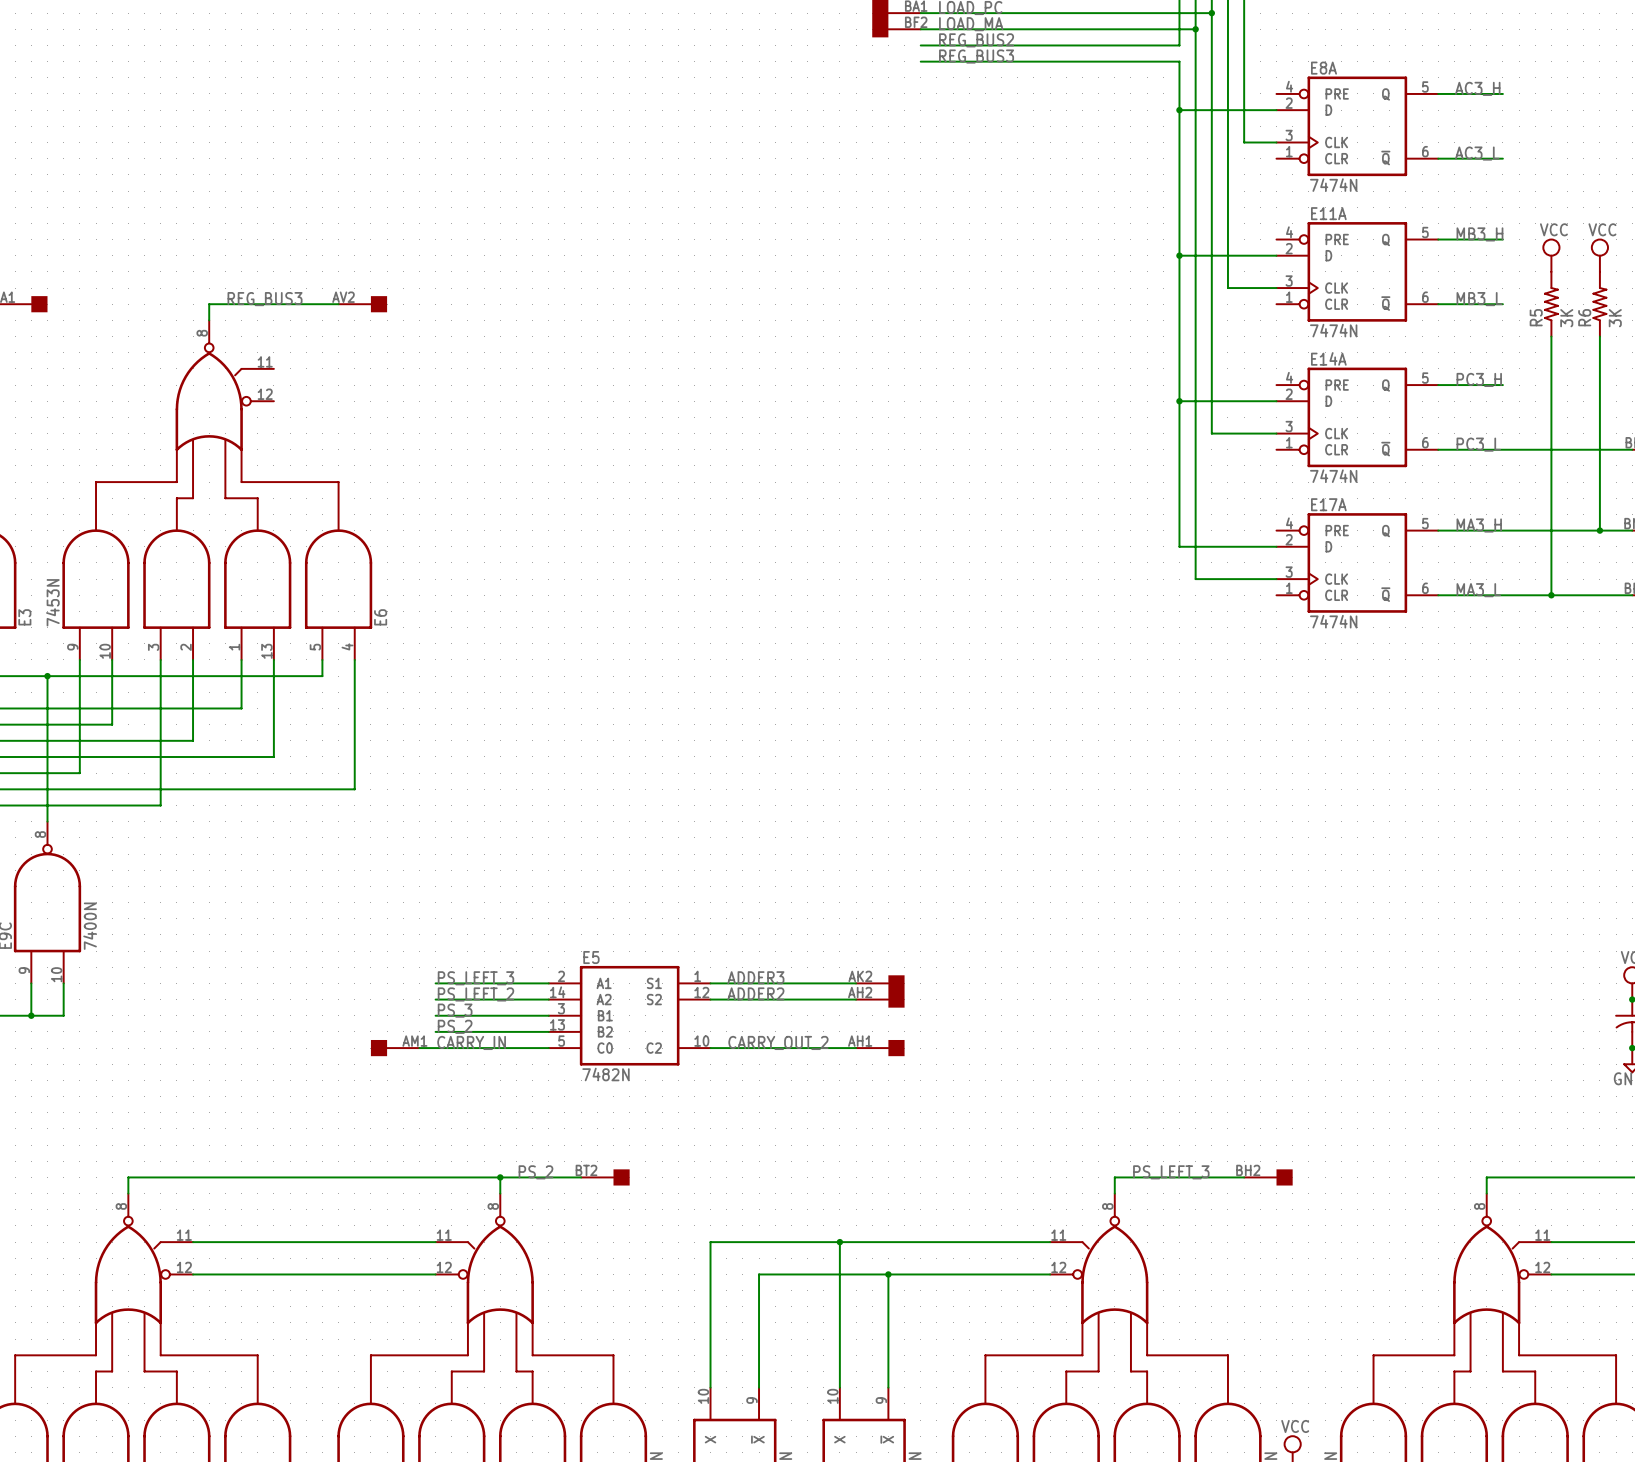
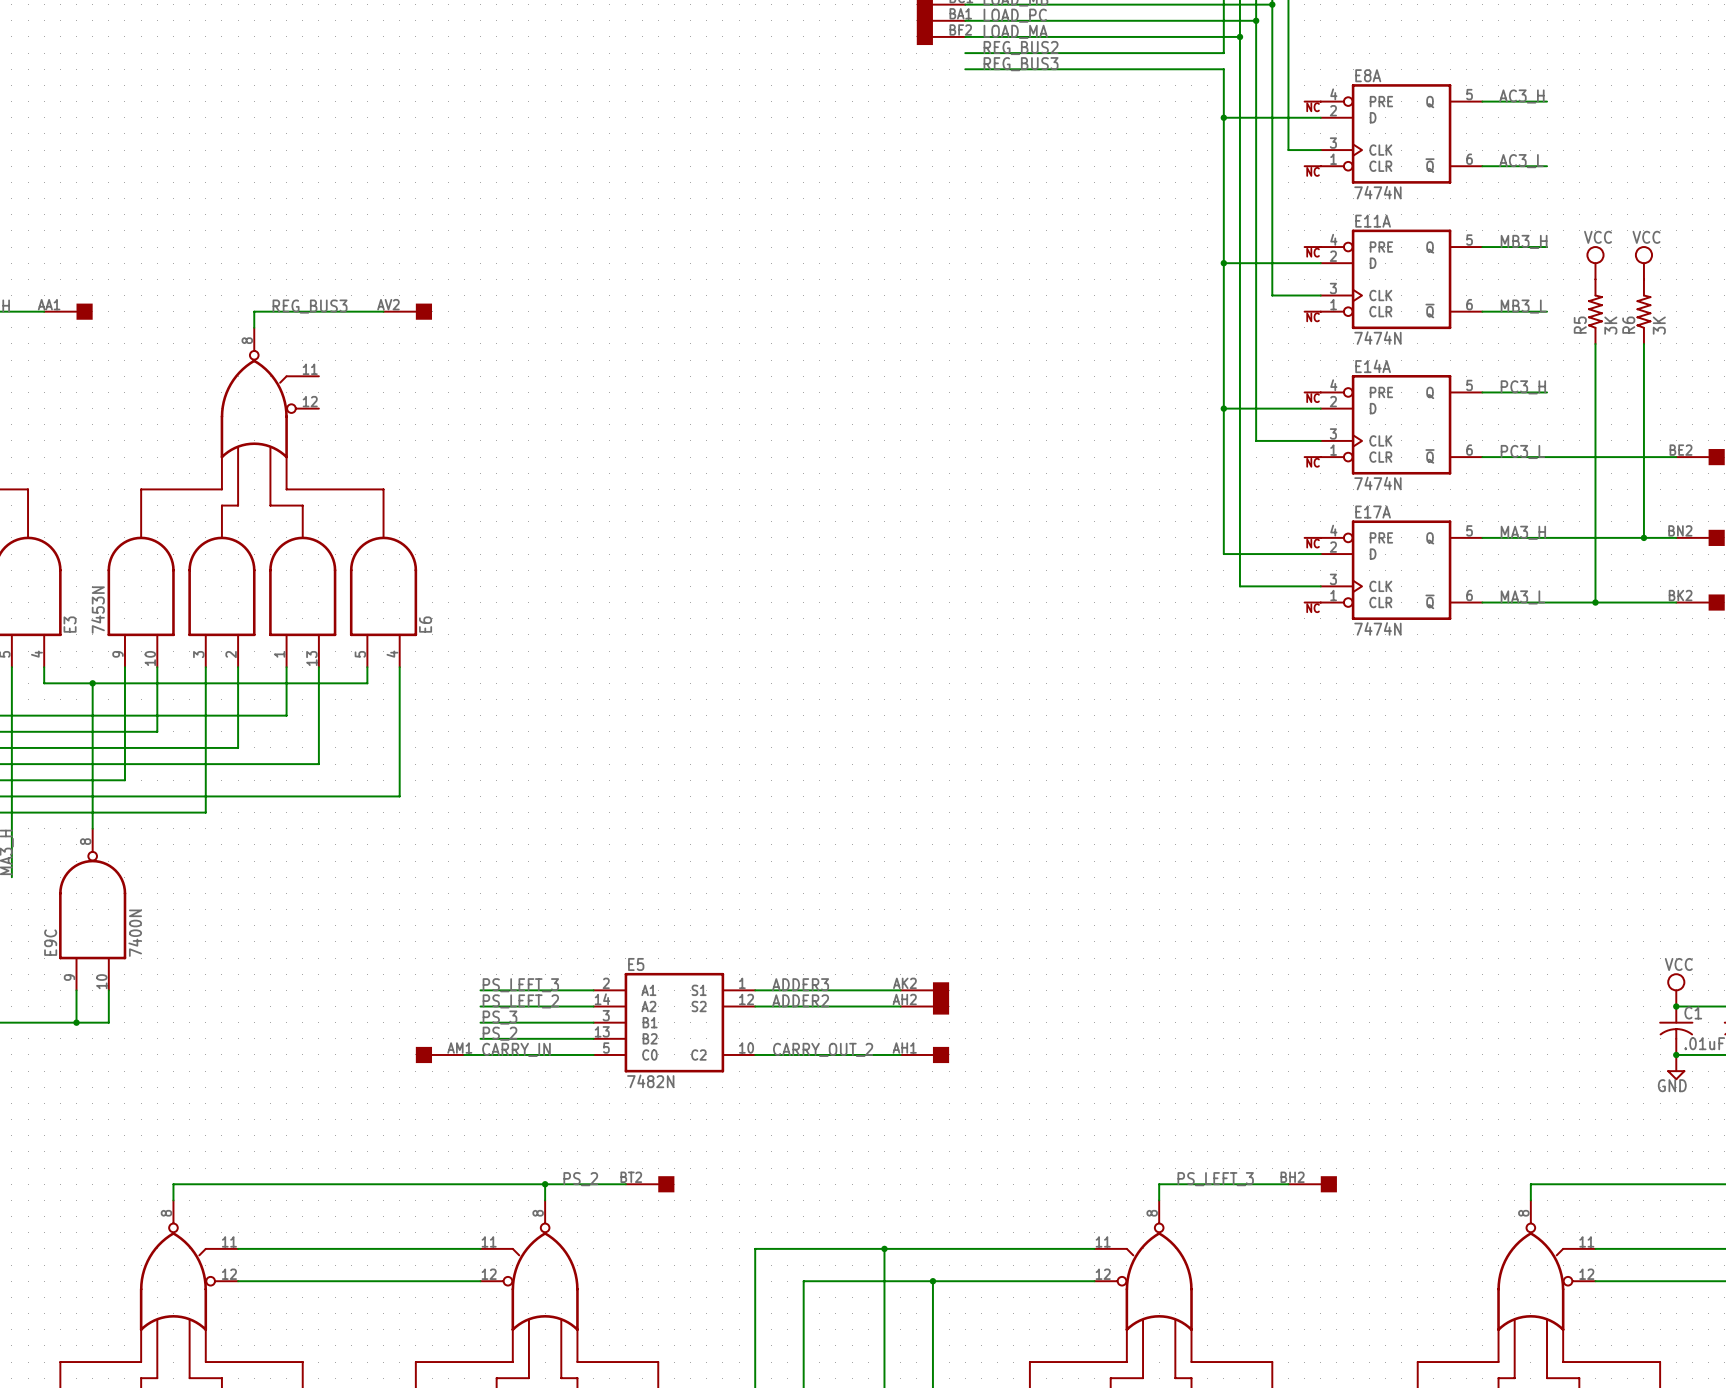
power symbol: none -> (1312, 101)
power symbol: none -> (1312, 166)
power symbol: none -> (1312, 247)
power symbol: none -> (1312, 311)
power symbol: none -> (1312, 392)
power symbol: none -> (1312, 457)
power symbol: none -> (1312, 537)
power symbol: none -> (1312, 602)

